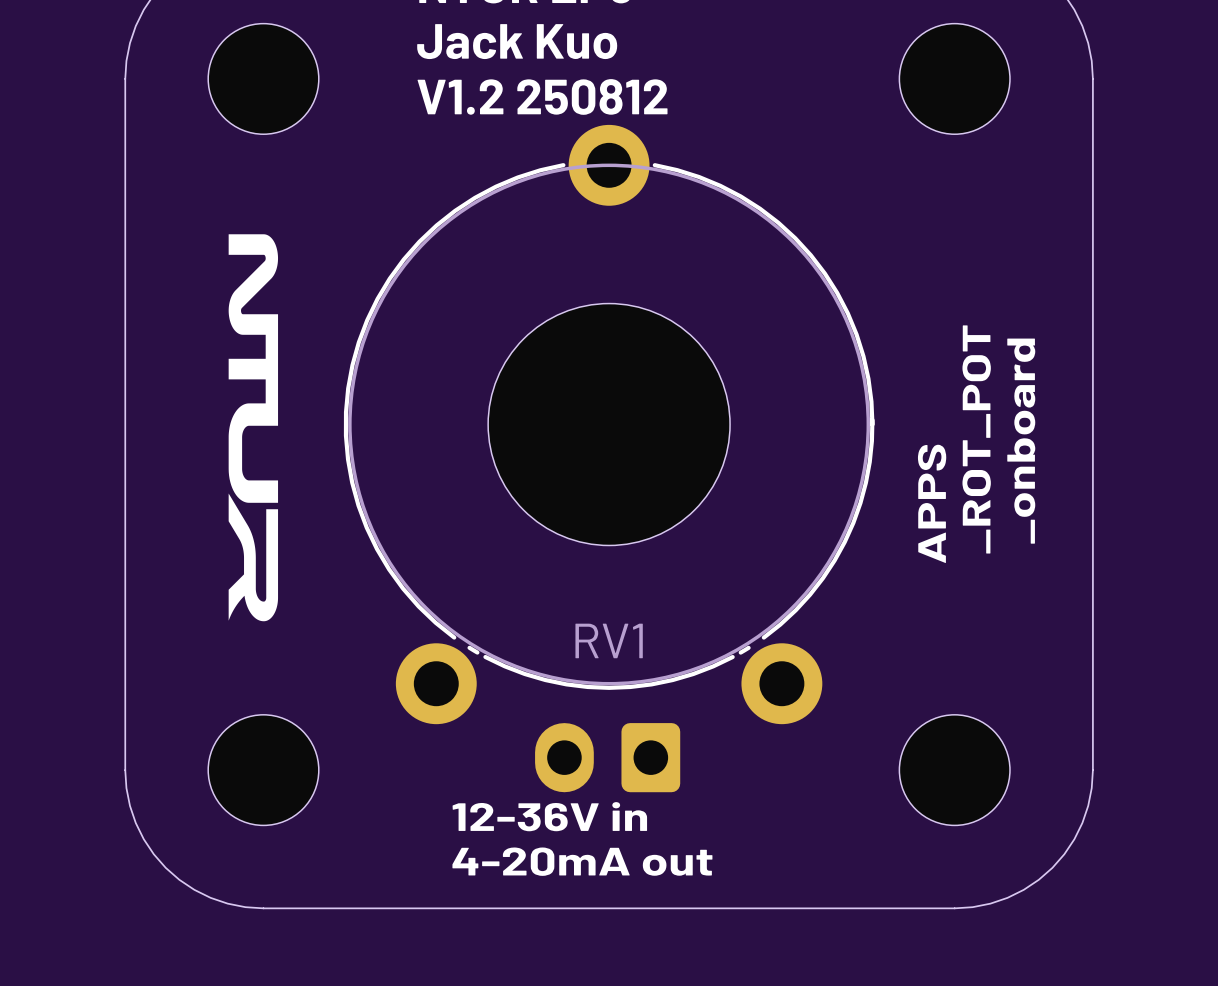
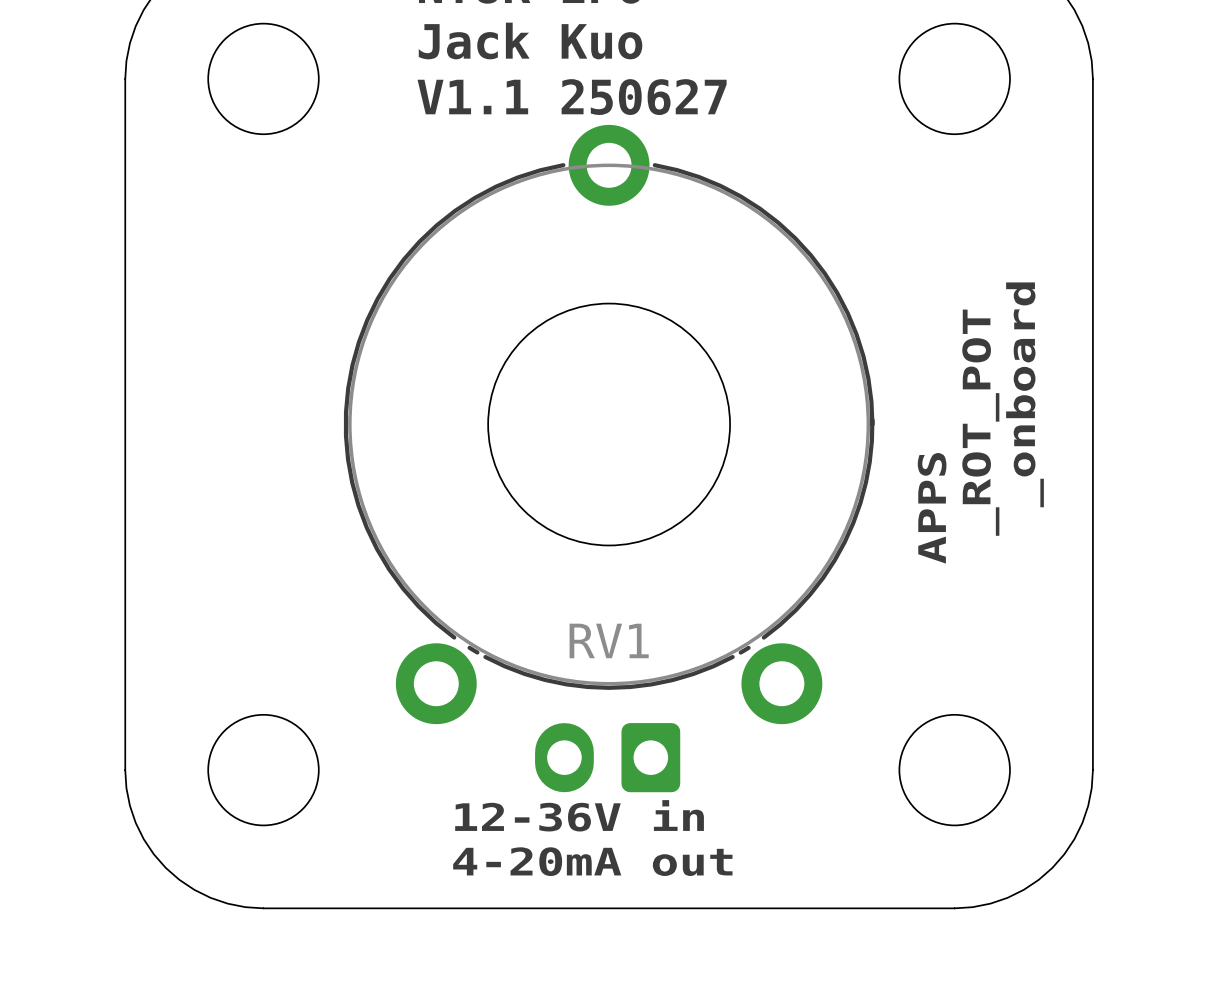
text: V1.2 250812 (542, 96) -> V1.1 250627 (572, 97)
drawing: [228, 234, 279, 622] -> none

